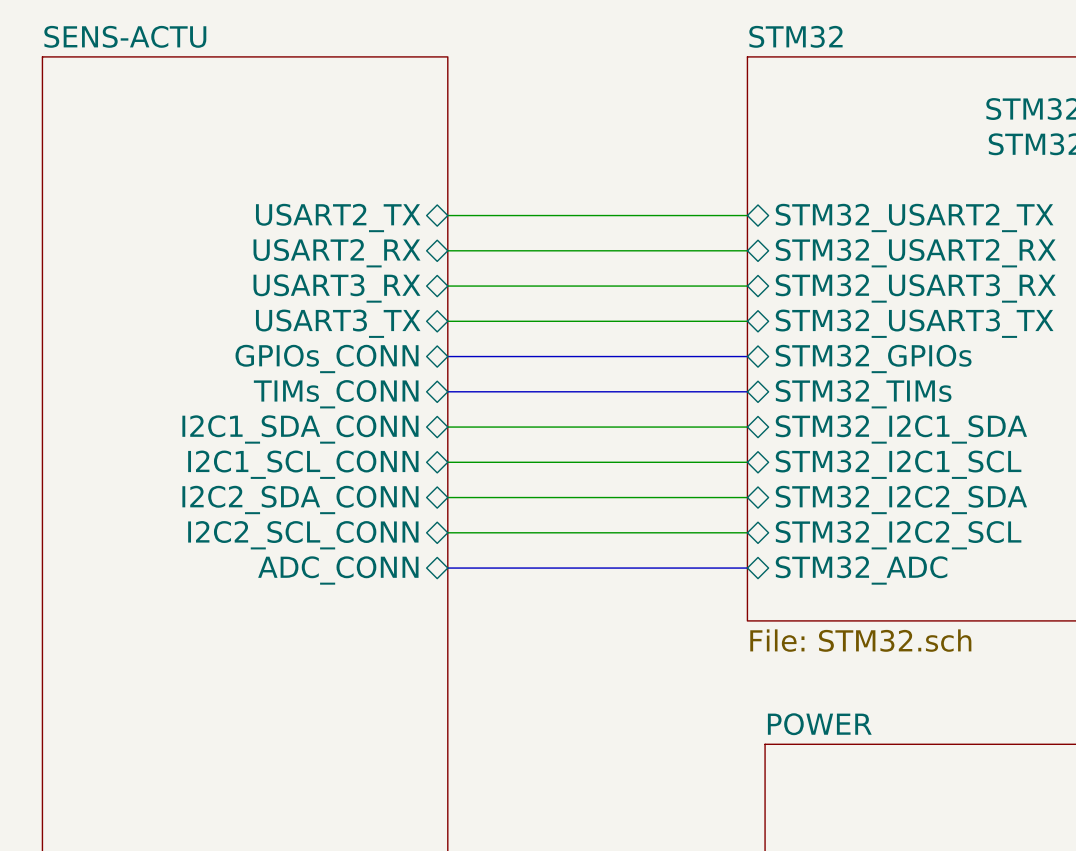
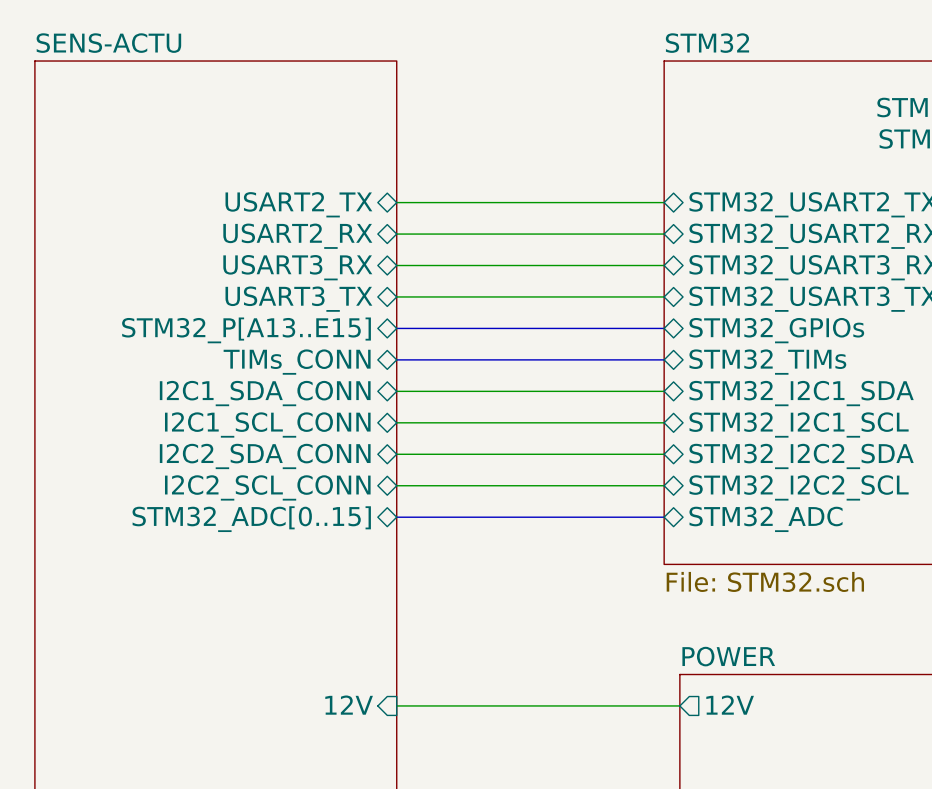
sheet pin: GPIOs_CONN (327, 358) -> STM32_P[A13..E15] (246, 330)
sheet pin: ADC_CONN (338, 570) -> STM32_ADC[0..15] (251, 519)
sheet pin: none -> 12V (349, 705)
sheet pin: none -> 12V (730, 705)
wire: none -> (396, 705) (679, 705)

